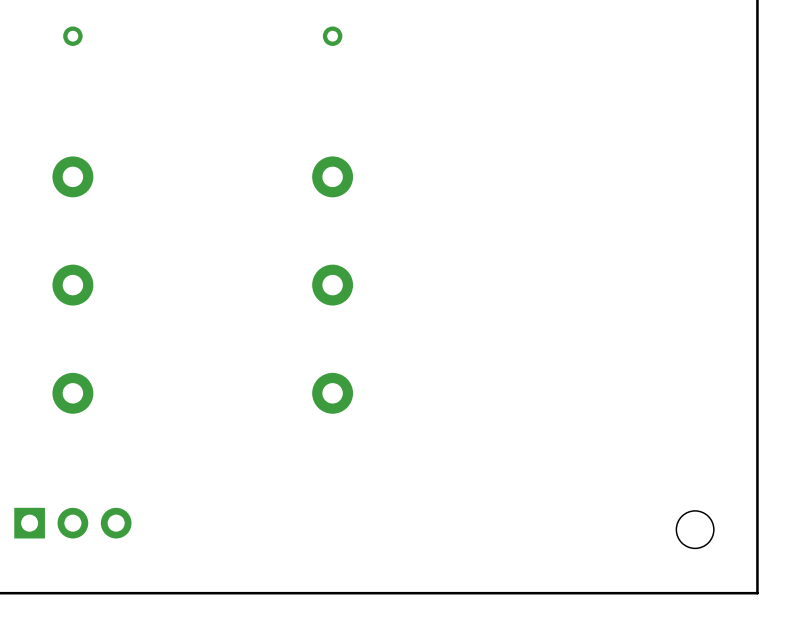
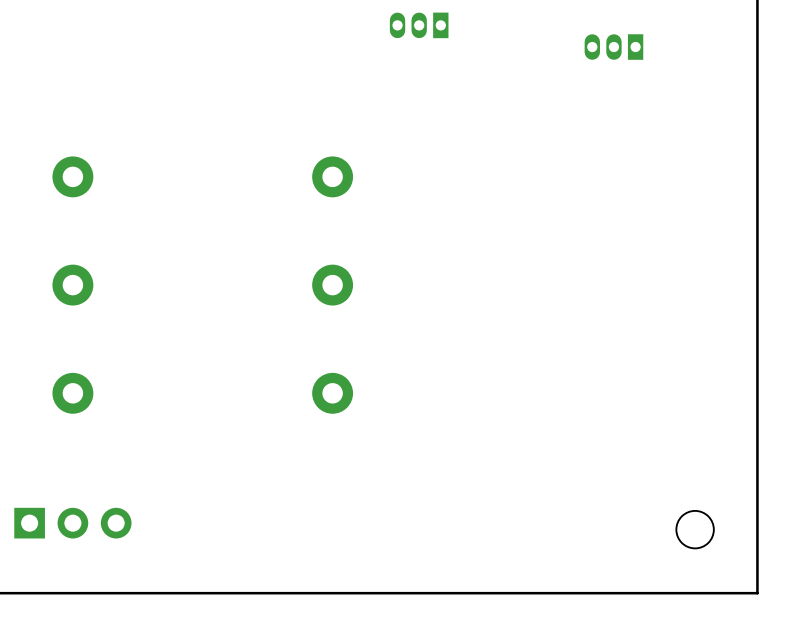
part: none -> (419, 25)
part: (72, 36) -> none
part: (332, 36) -> none
part: none -> (613, 47)

